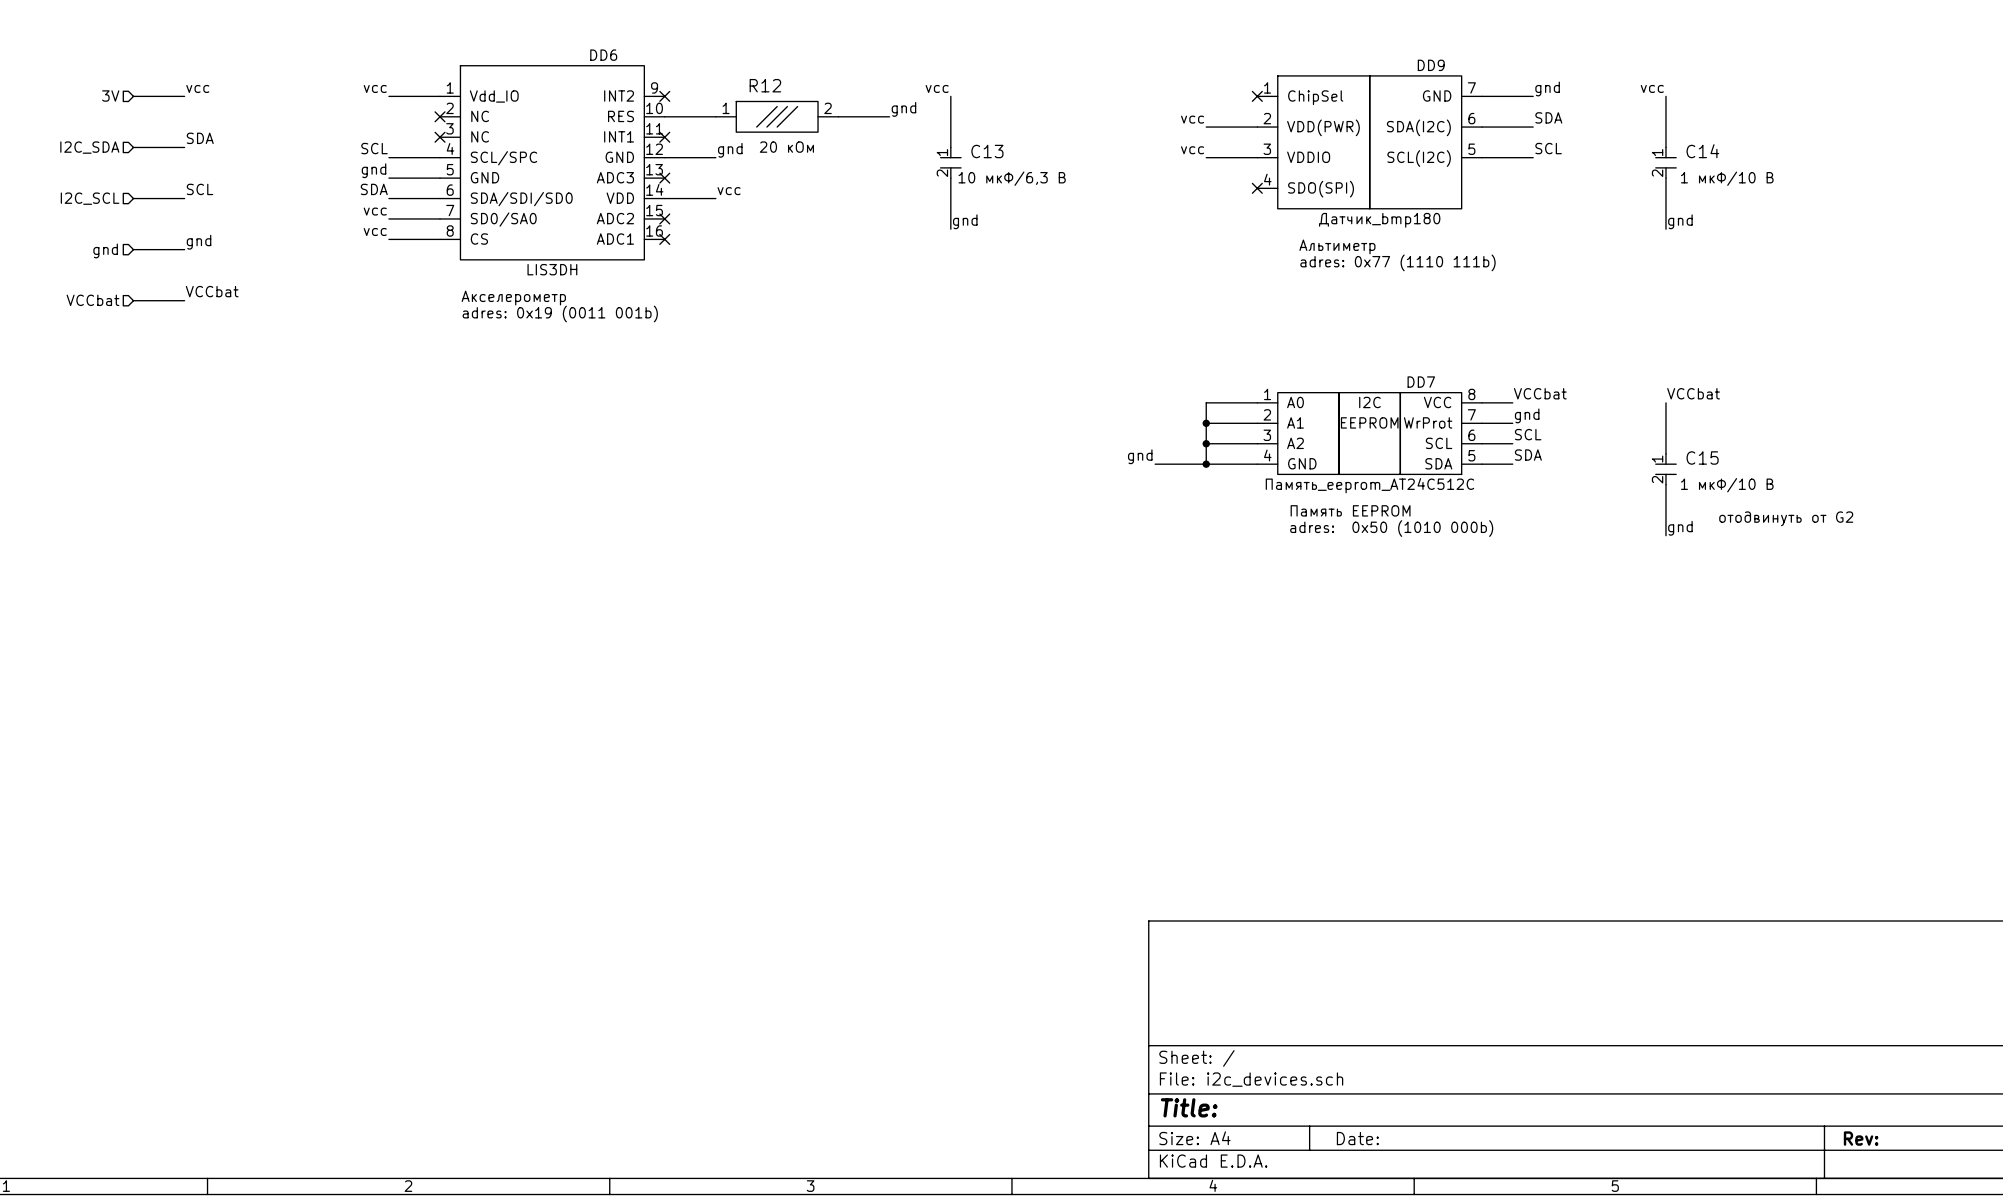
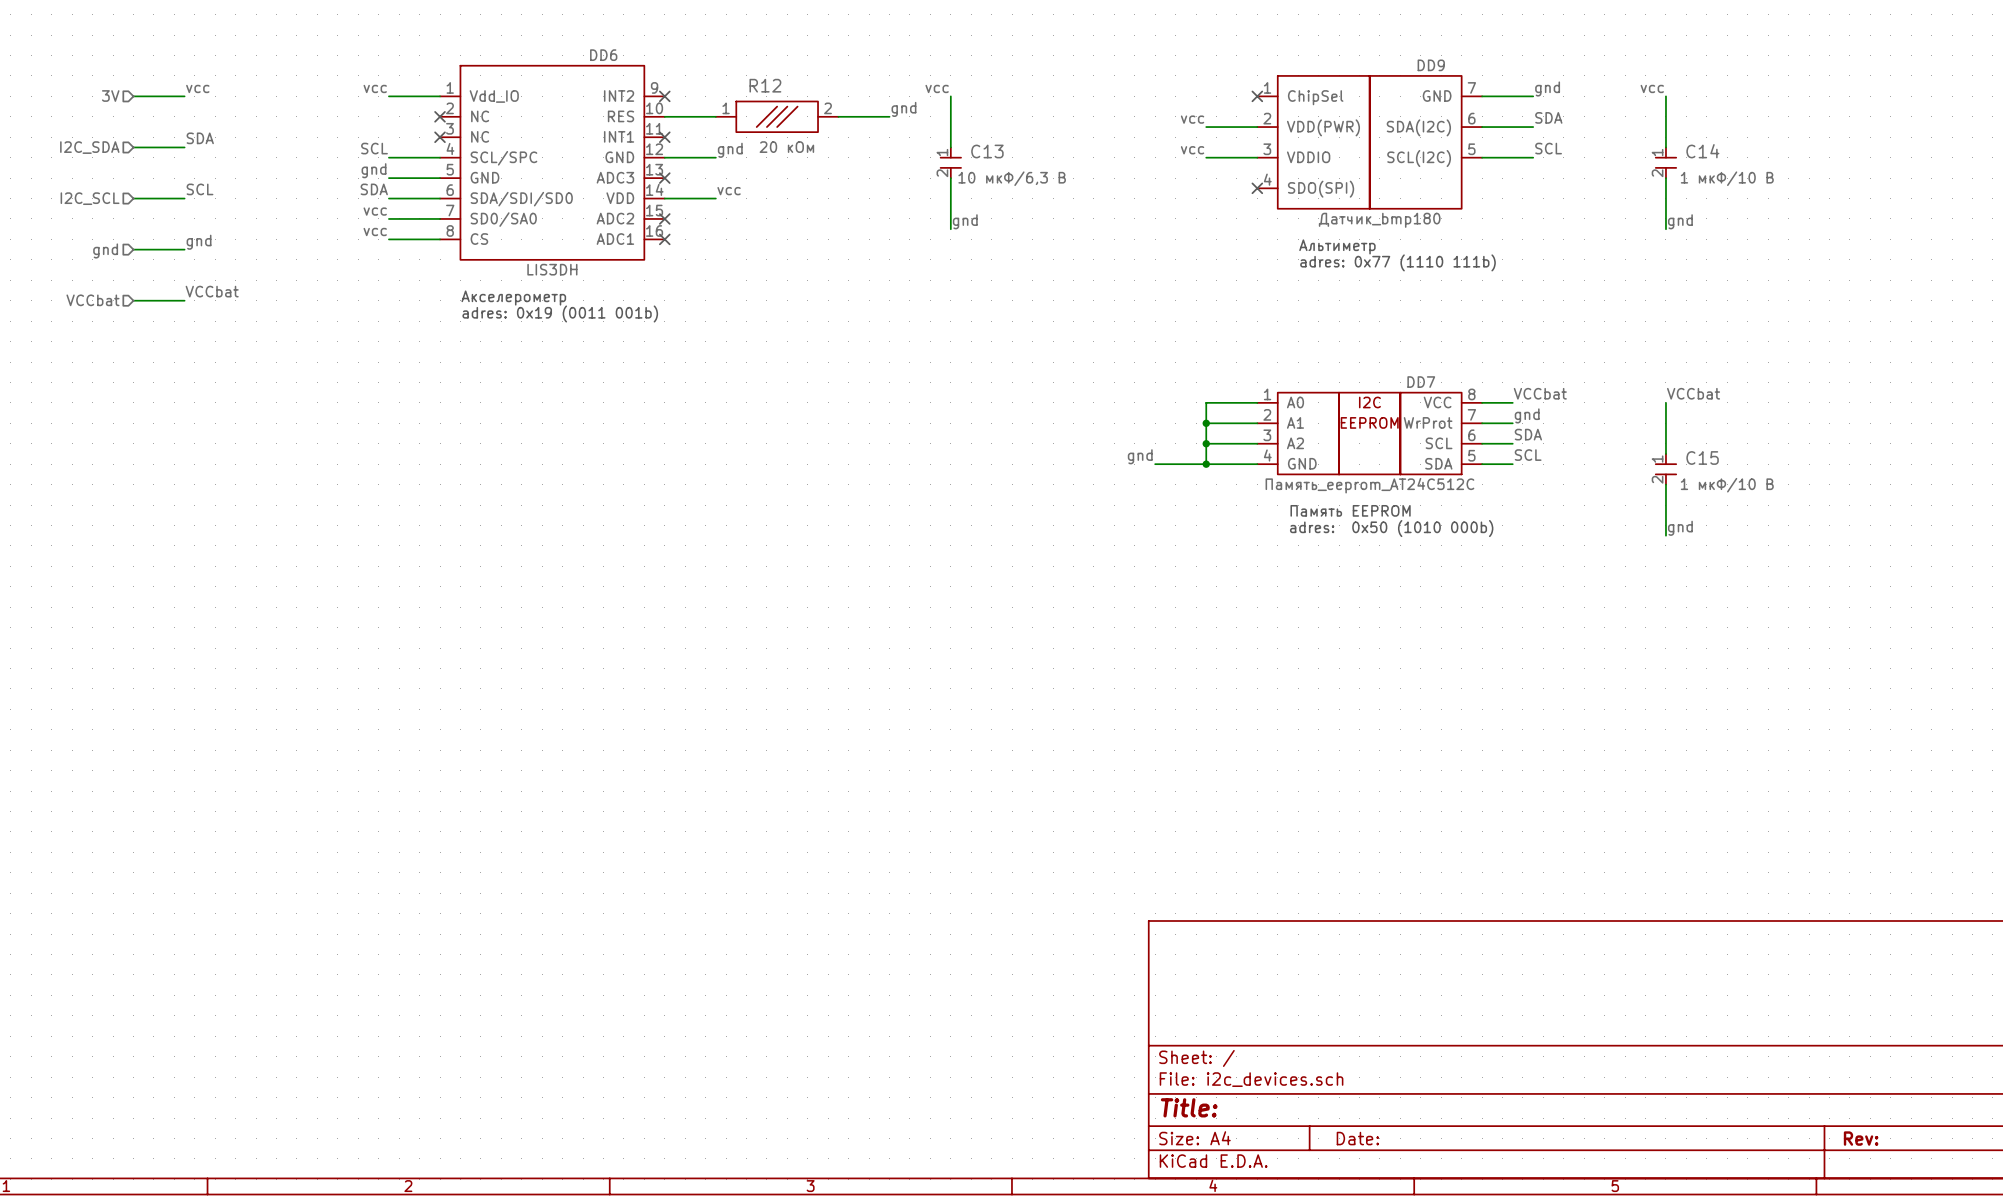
label: SCL (1528, 434) -> SDA (1528, 434)
label: SDA (1528, 455) -> SCL (1528, 455)
text: отодвинуть от G2 (1786, 518) -> none

